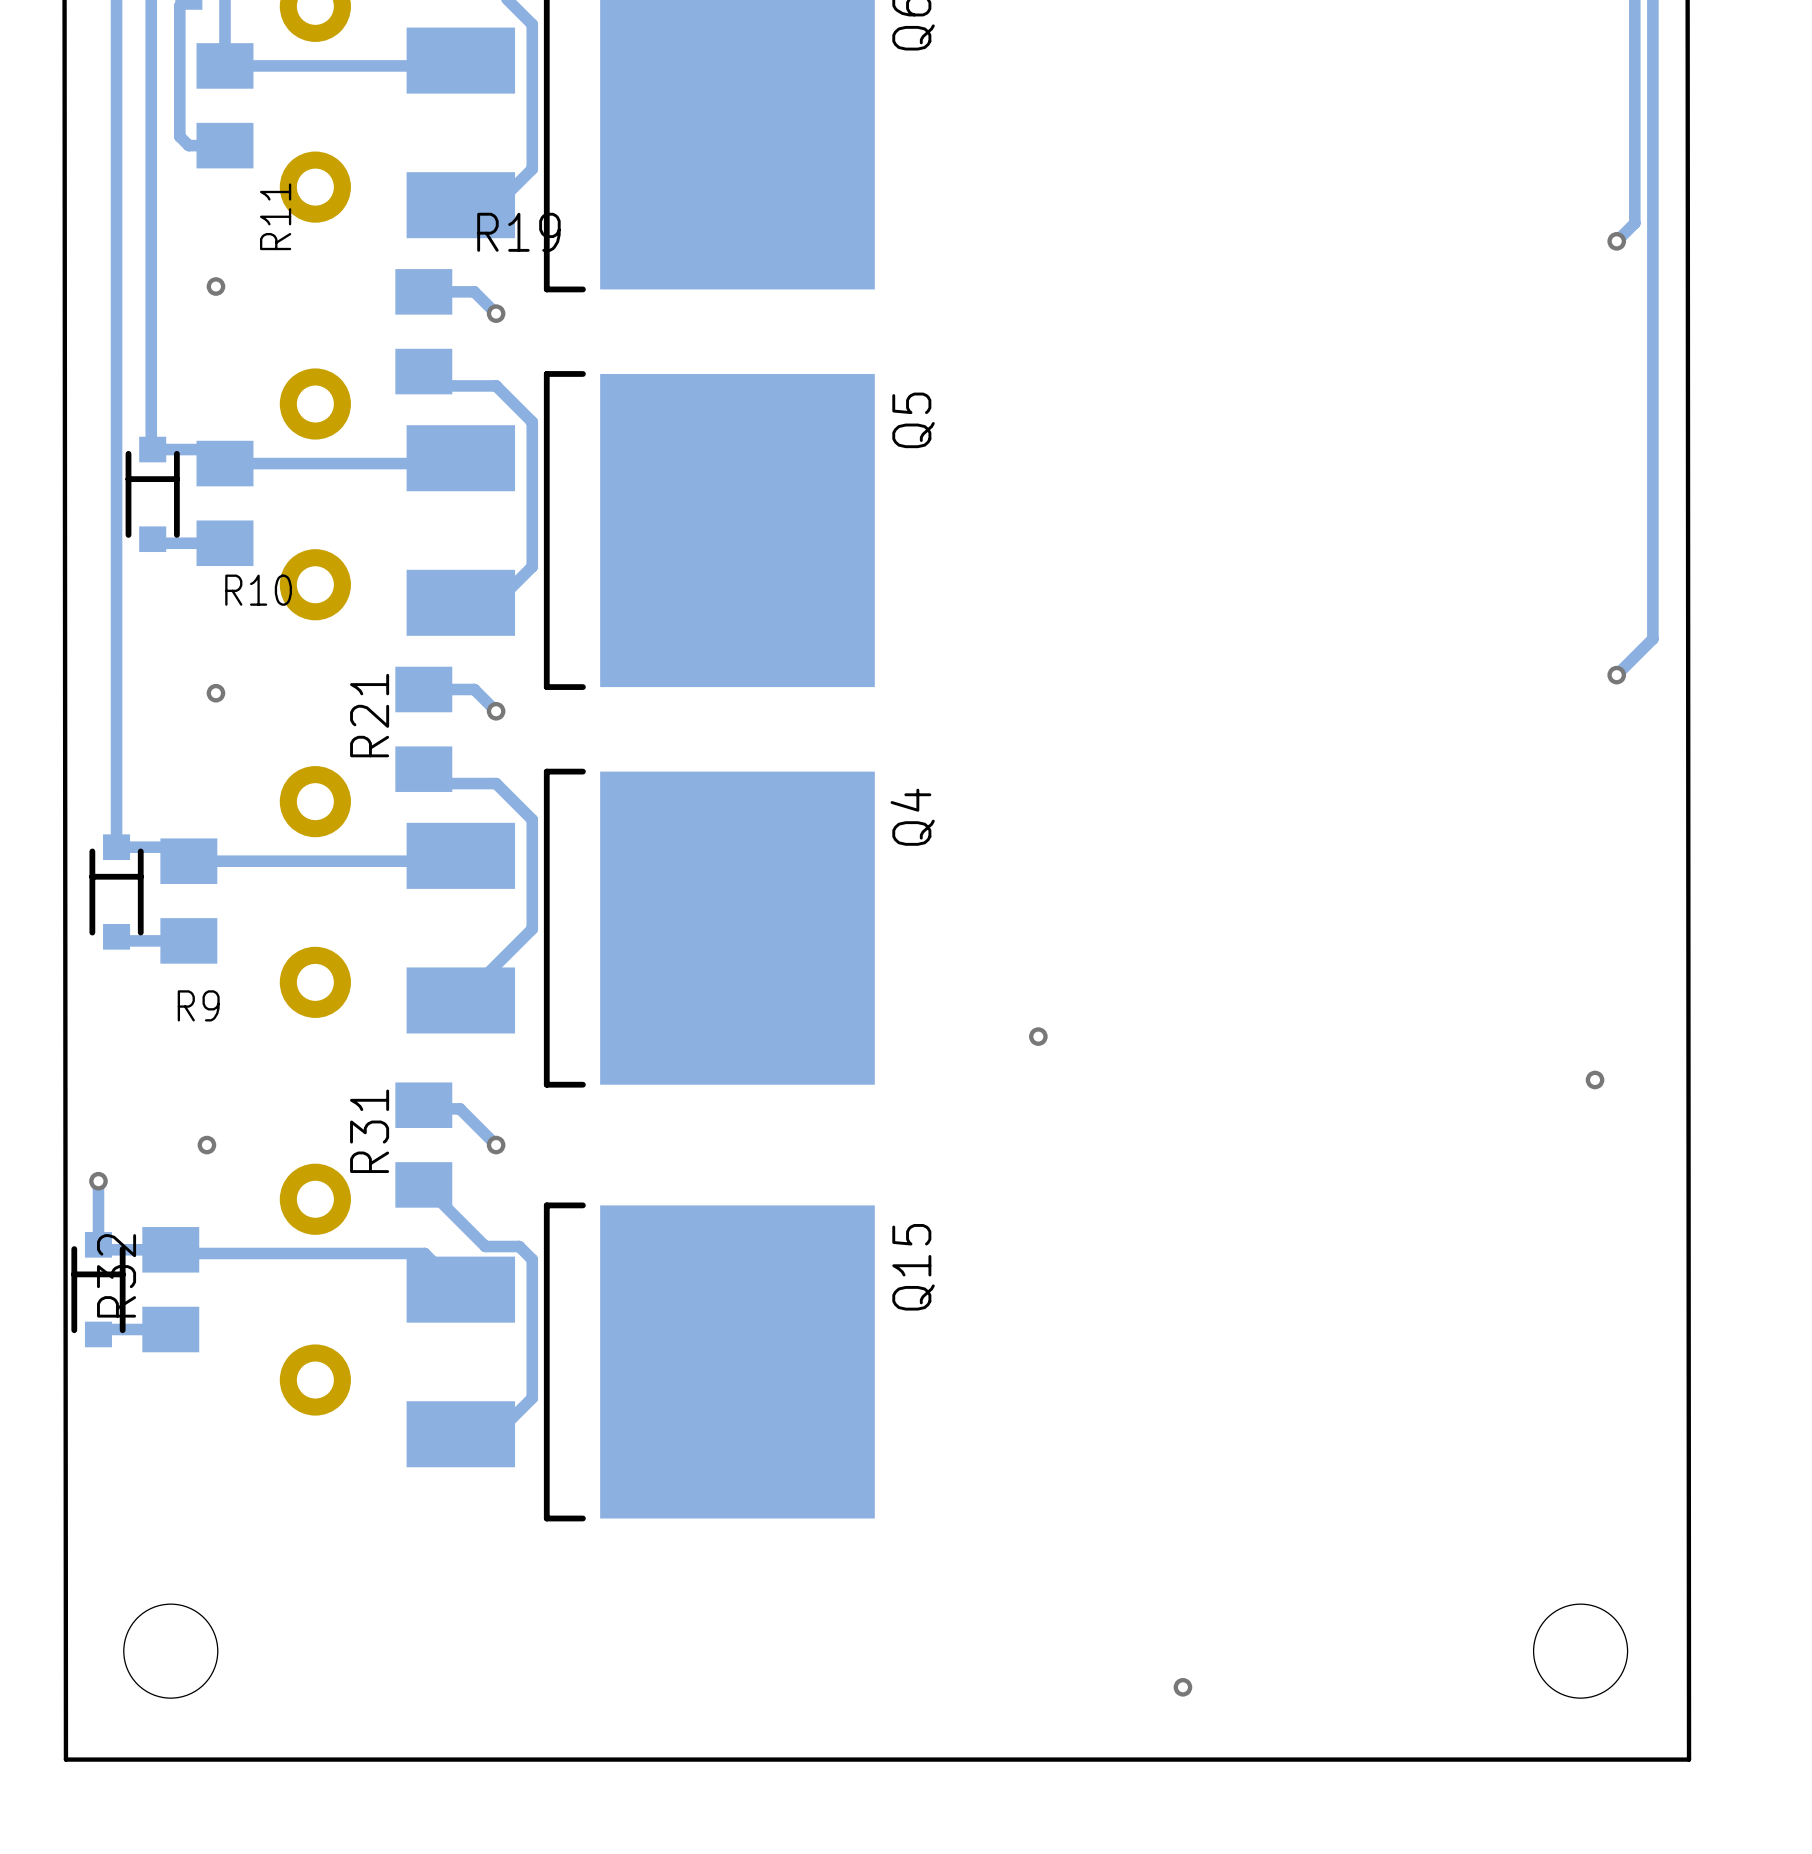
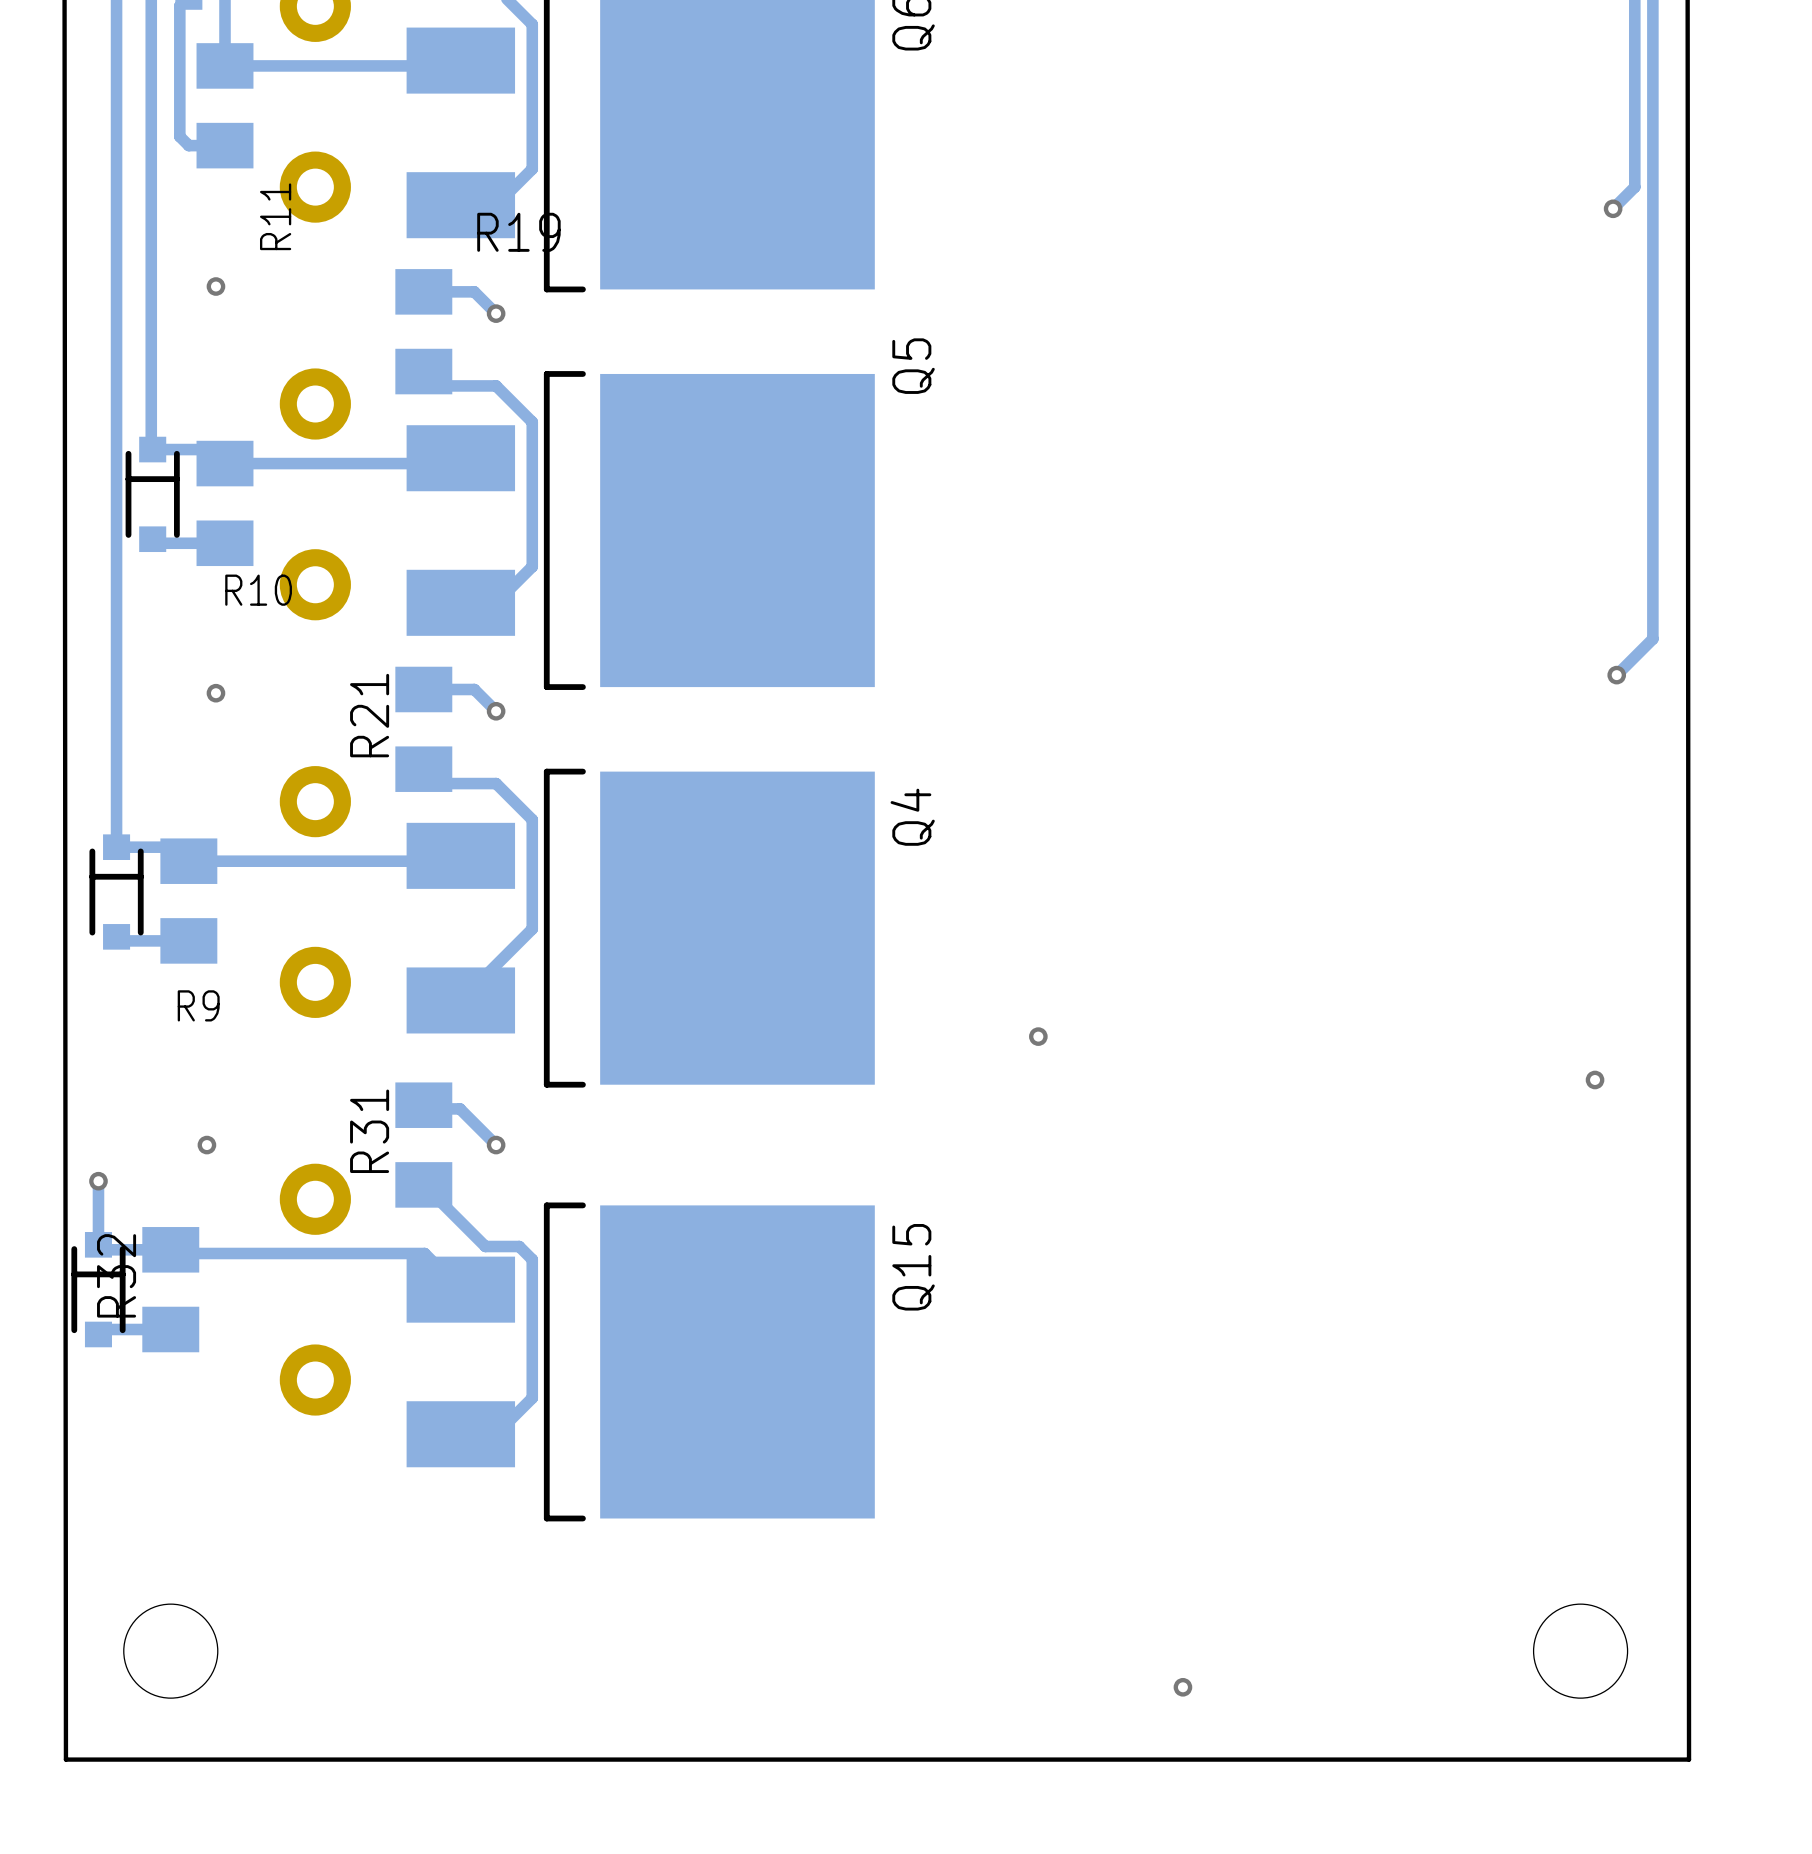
track: (1634, 187) (1634, 223) (1616, 241) -> (1634, 187) (1613, 208)
via position: (1616, 241) -> (1613, 208)
Q5 name position: Q5 (913, 420) -> Q5 (913, 366)

